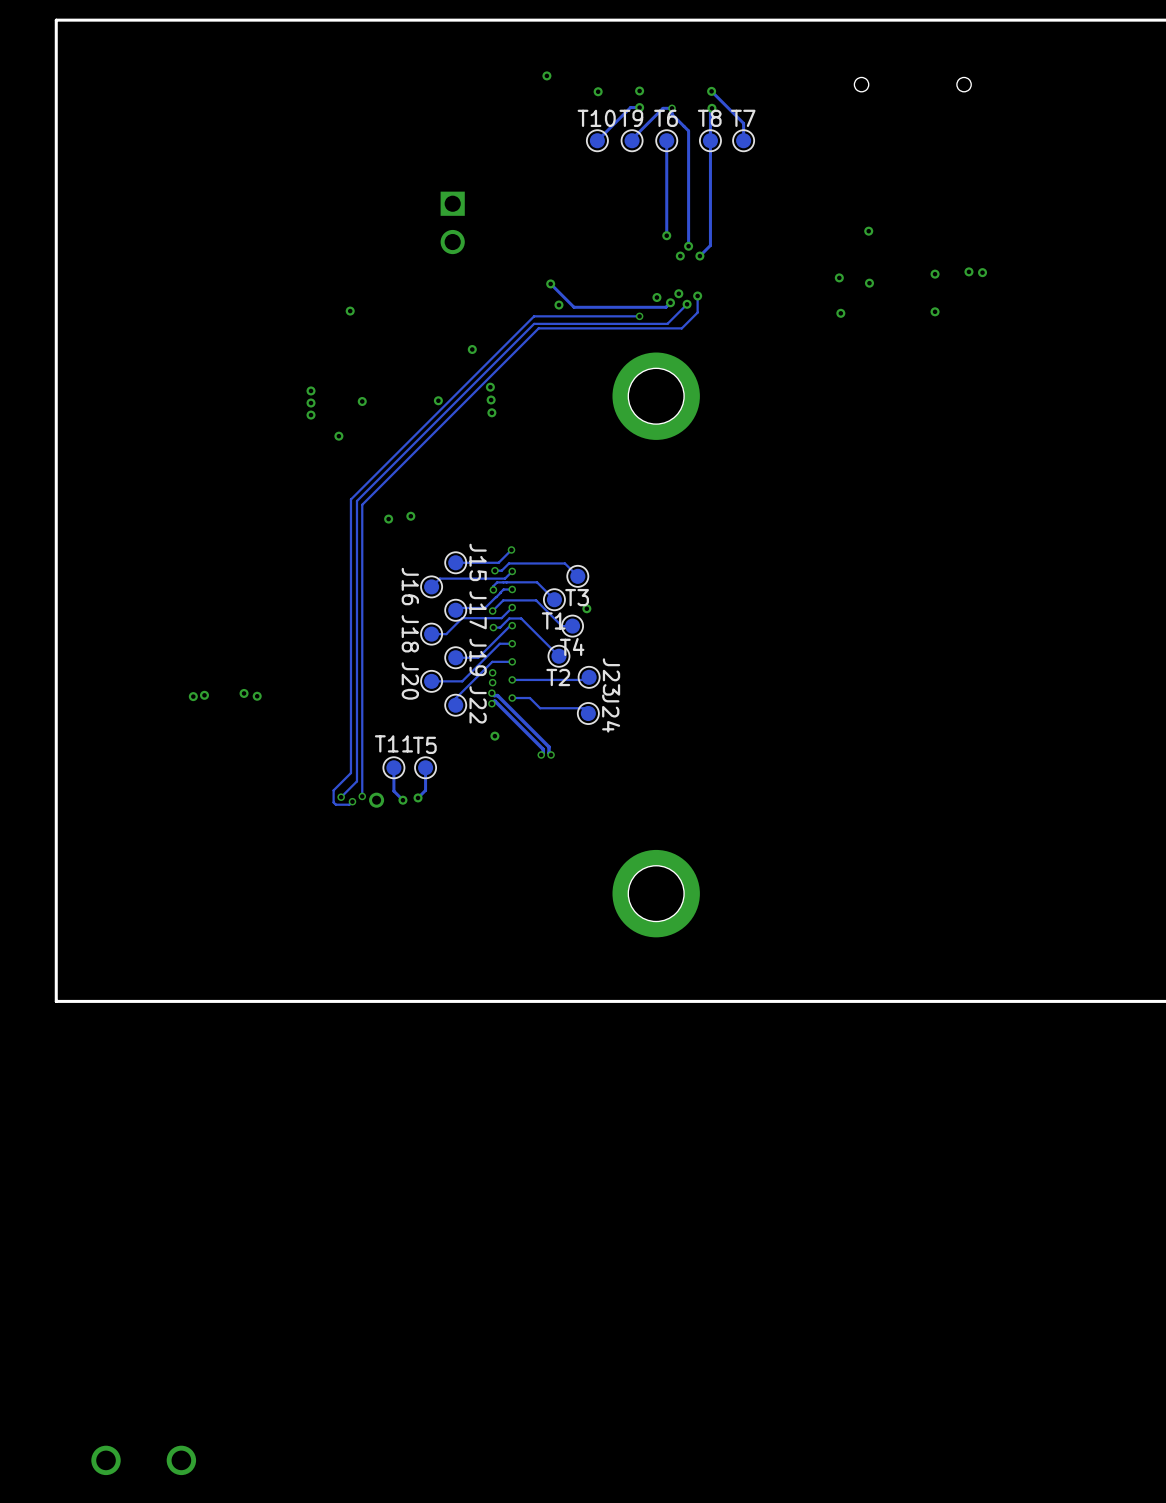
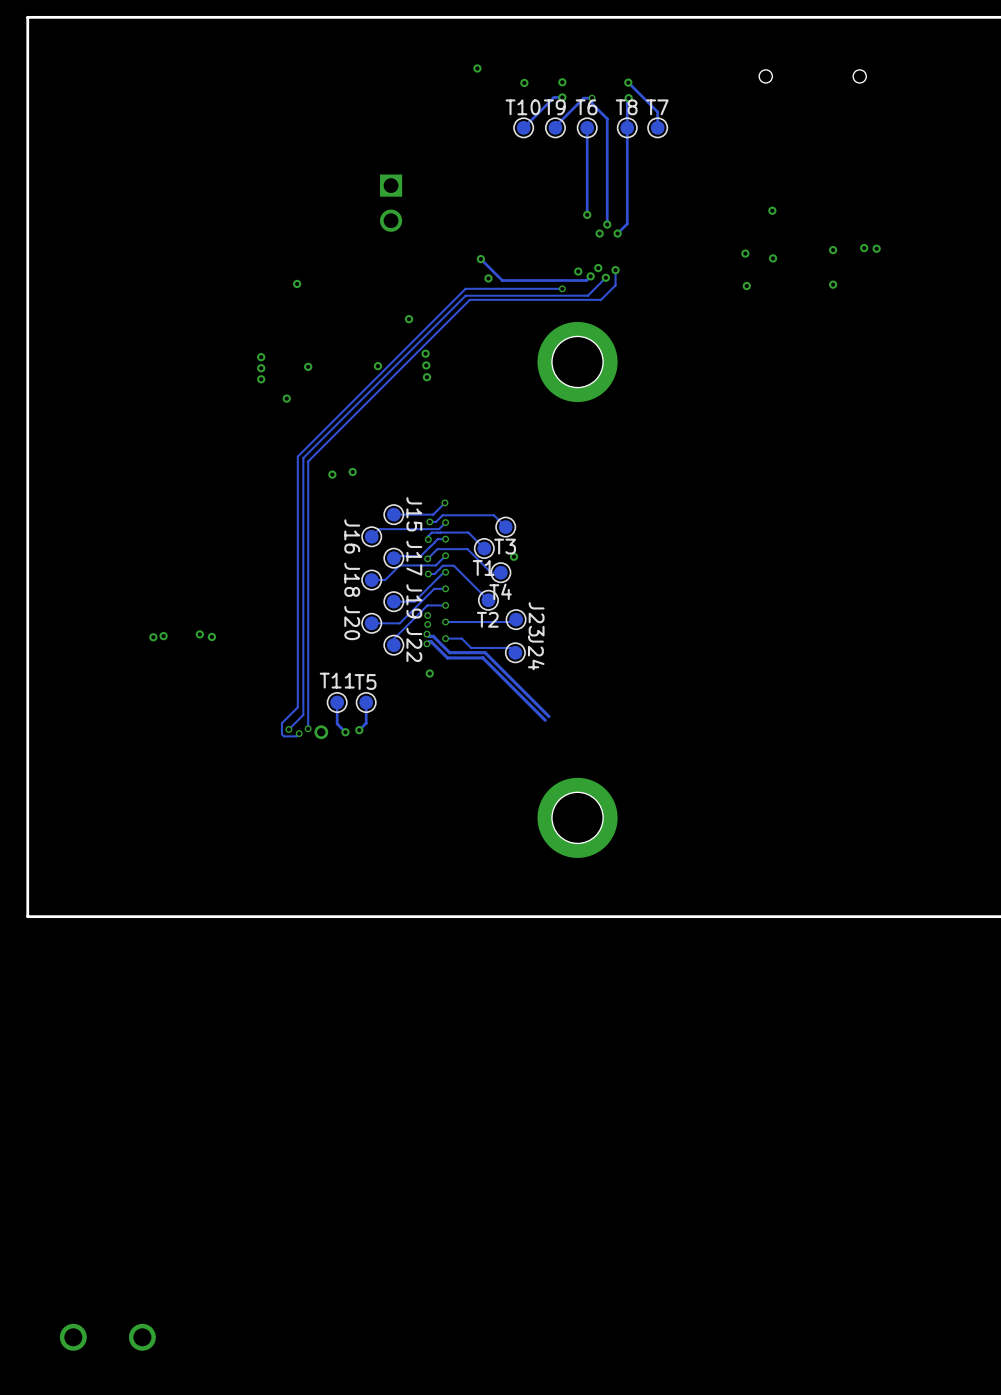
track: (497, 695) (549, 747) (551, 754) -> (432, 636) (449, 652) (485, 652) (549, 716)
track: (495, 701) (543, 749) (541, 754) -> (430, 641) (447, 657) (482, 657) (545, 720)
via: (541, 754) -> none
via: (551, 754) -> none

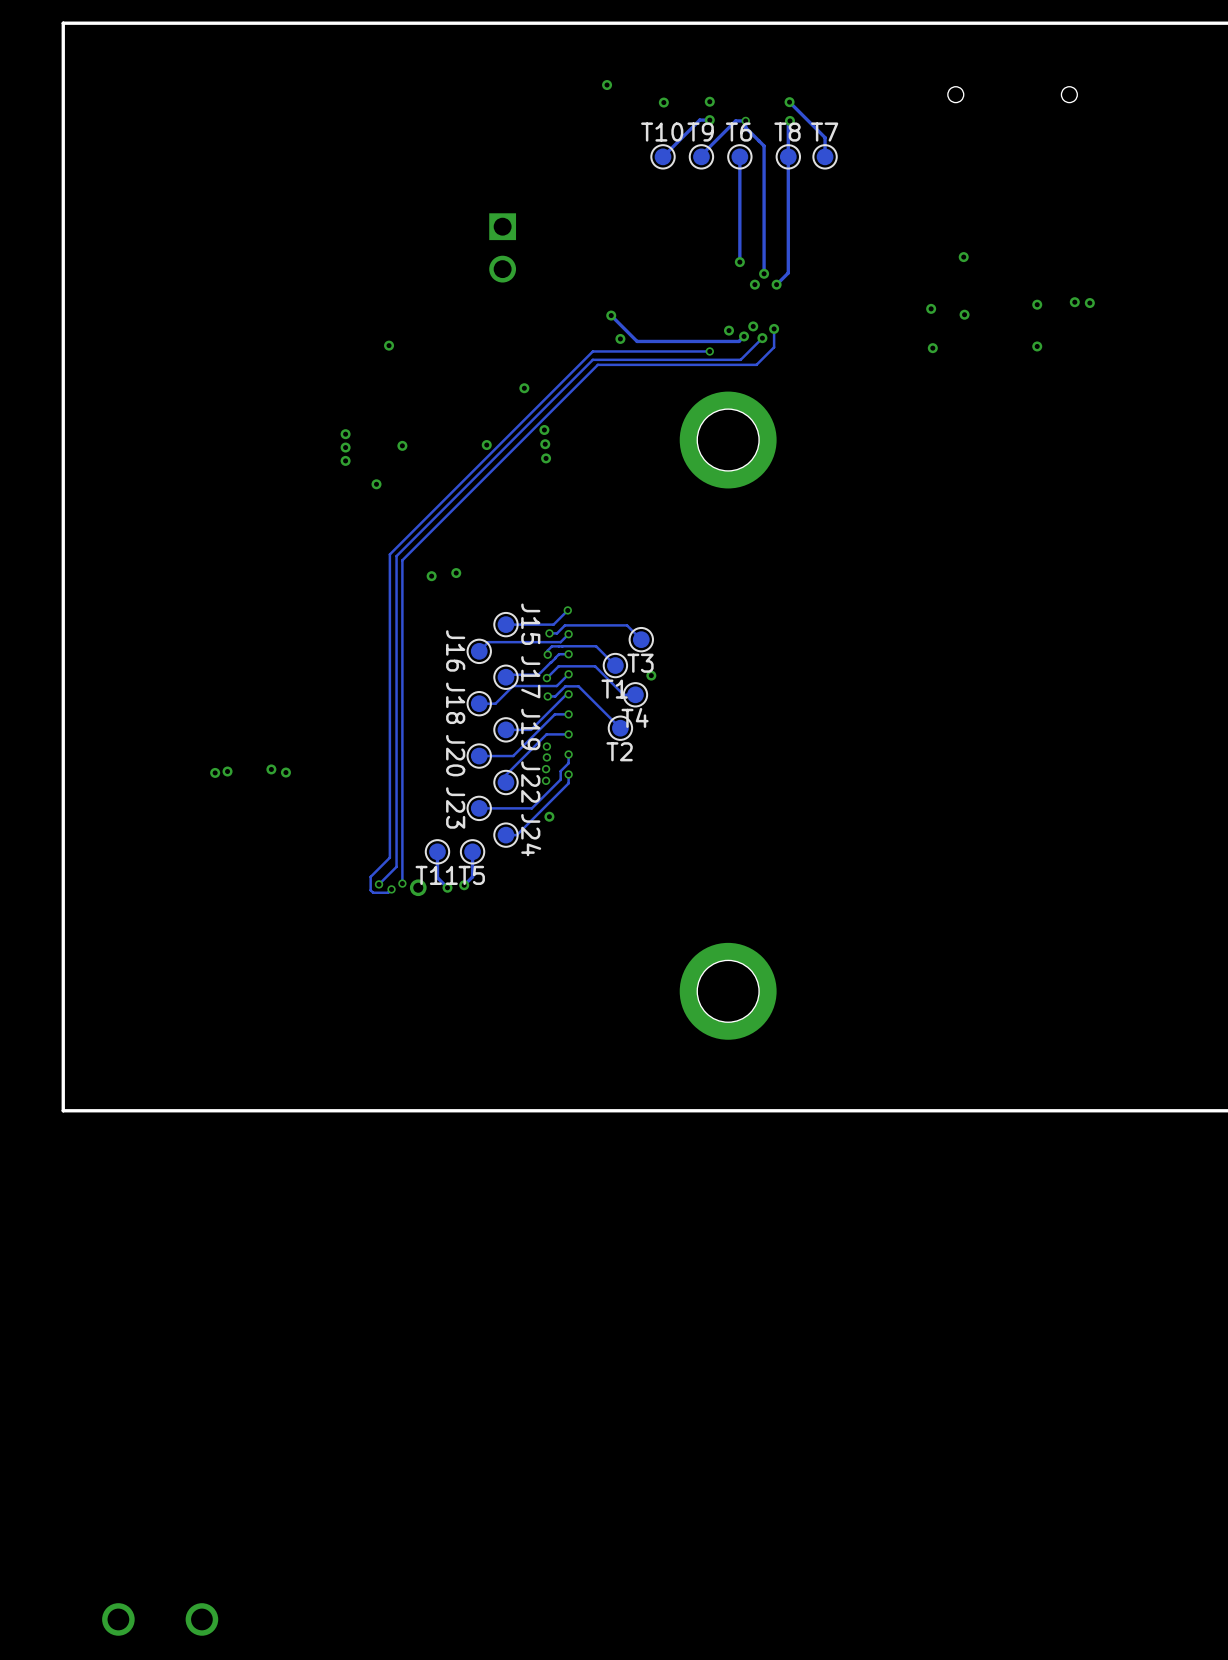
track: (516, 619) (513, 622) (445, 622) -> (479, 808) (531, 808) (560, 779) (560, 771) (568, 763) (568, 754)
J23 position: (516, 619) -> (479, 808)
J23 name position: J23 (536, 619) -> J23 (455, 807)
track: (426, 634) (433, 636) (449, 652) (485, 652) (549, 716) -> none
track: (445, 638) (461, 638) (471, 647) (515, 647) -> (568, 774) (568, 783) (516, 835) (505, 835)
track: (426, 643) (431, 641) (447, 657) (482, 657) (545, 720) -> none
J24 position: (515, 652) -> (505, 835)
T11 name position: T11 (337, 680) -> T11 (436, 875)
T5 name position: T5 (365, 681) -> T5 (471, 875)

